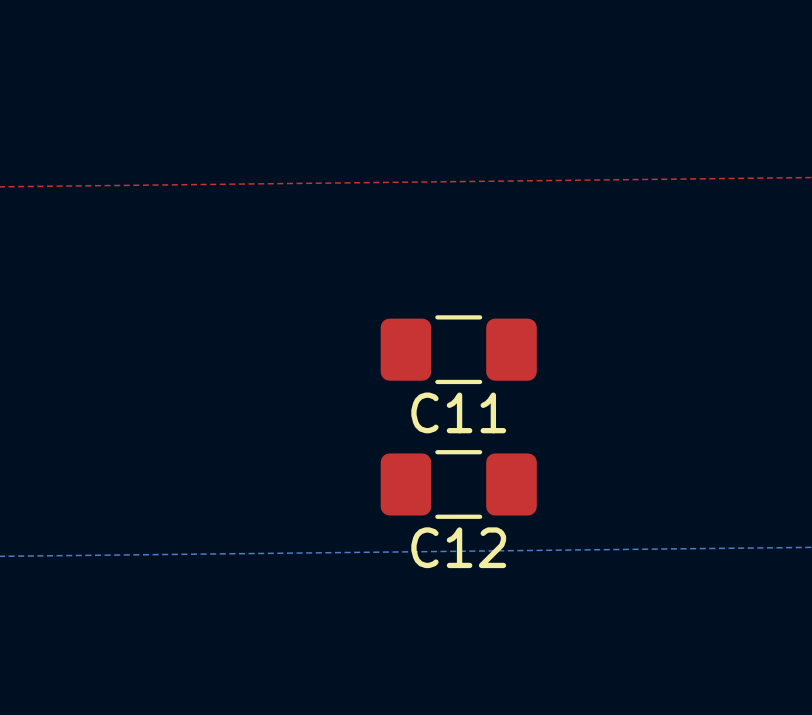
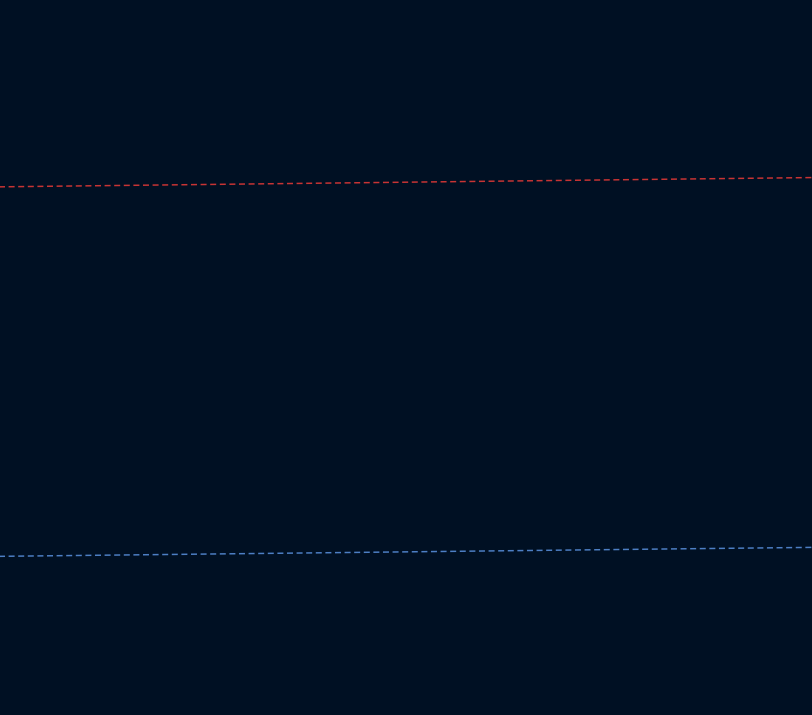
C11: (458, 349) -> none
C12: (458, 484) -> none

